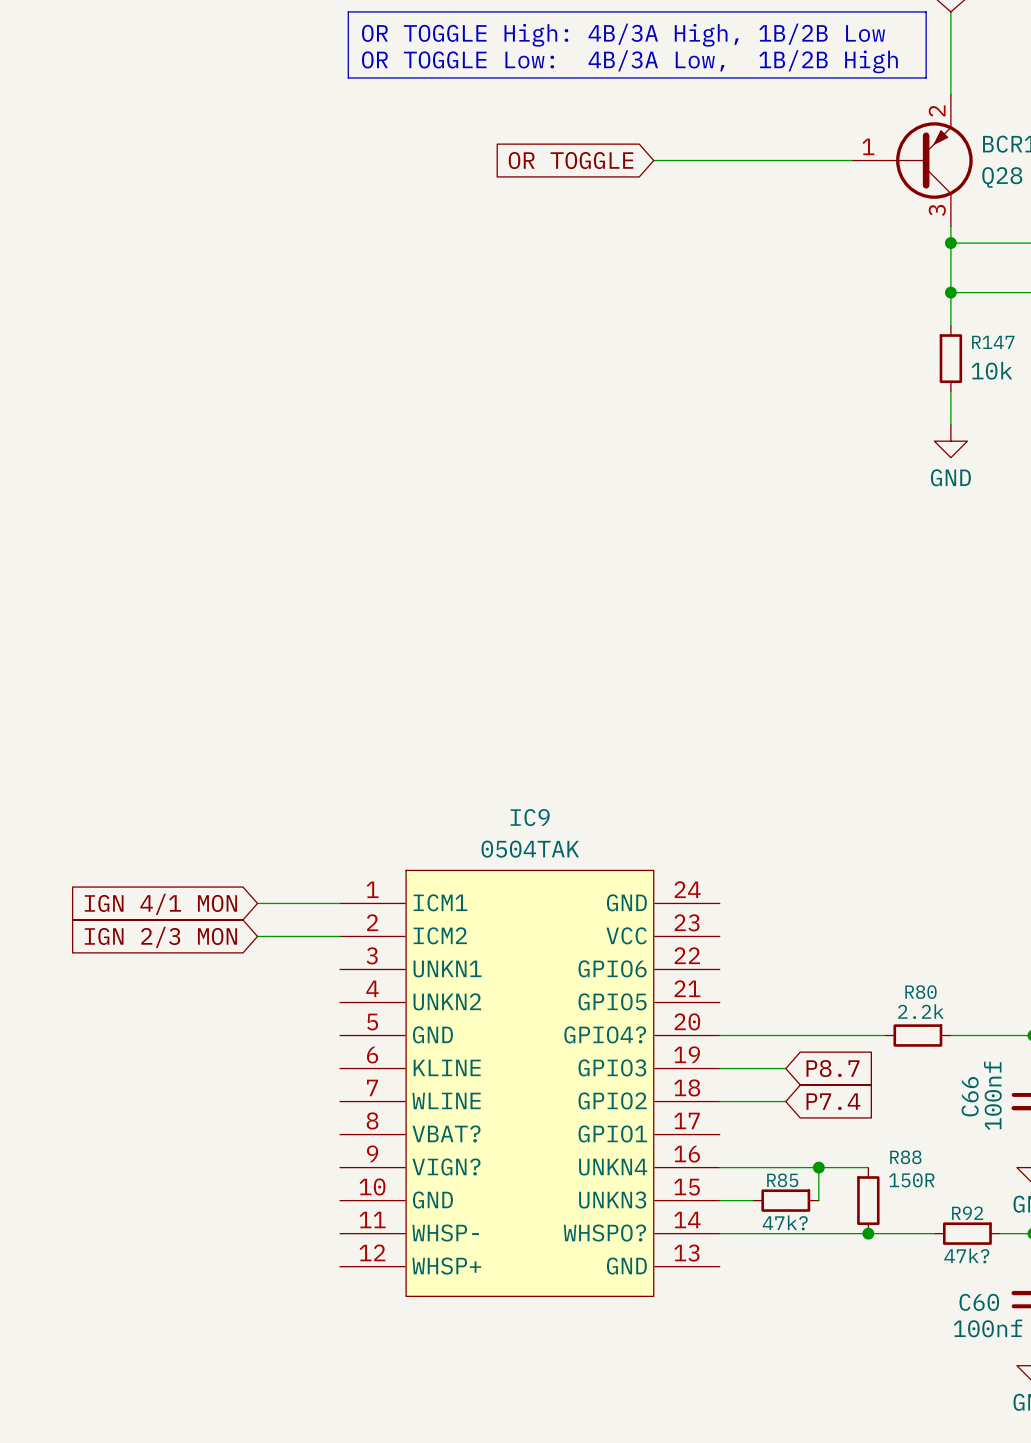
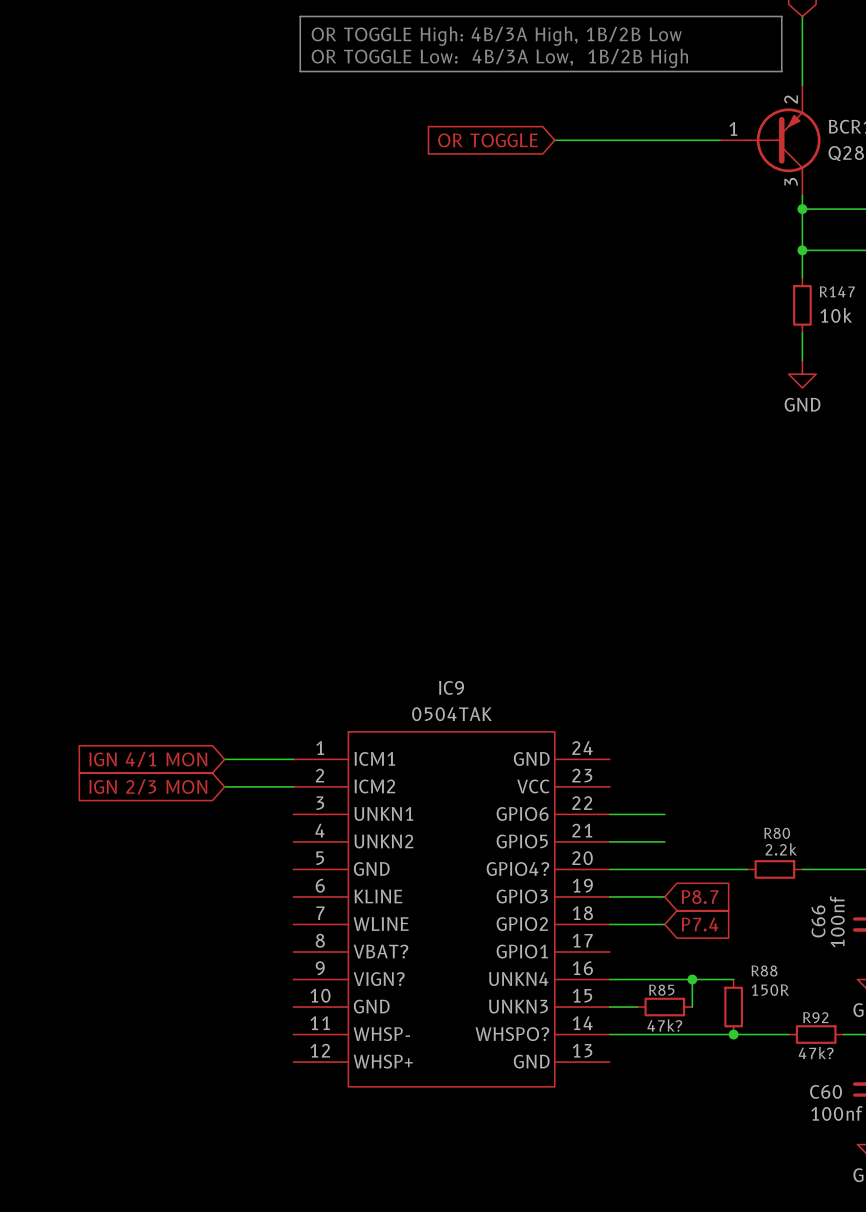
wire: none -> (609, 814) (664, 814)
wire: none -> (609, 841) (664, 841)

